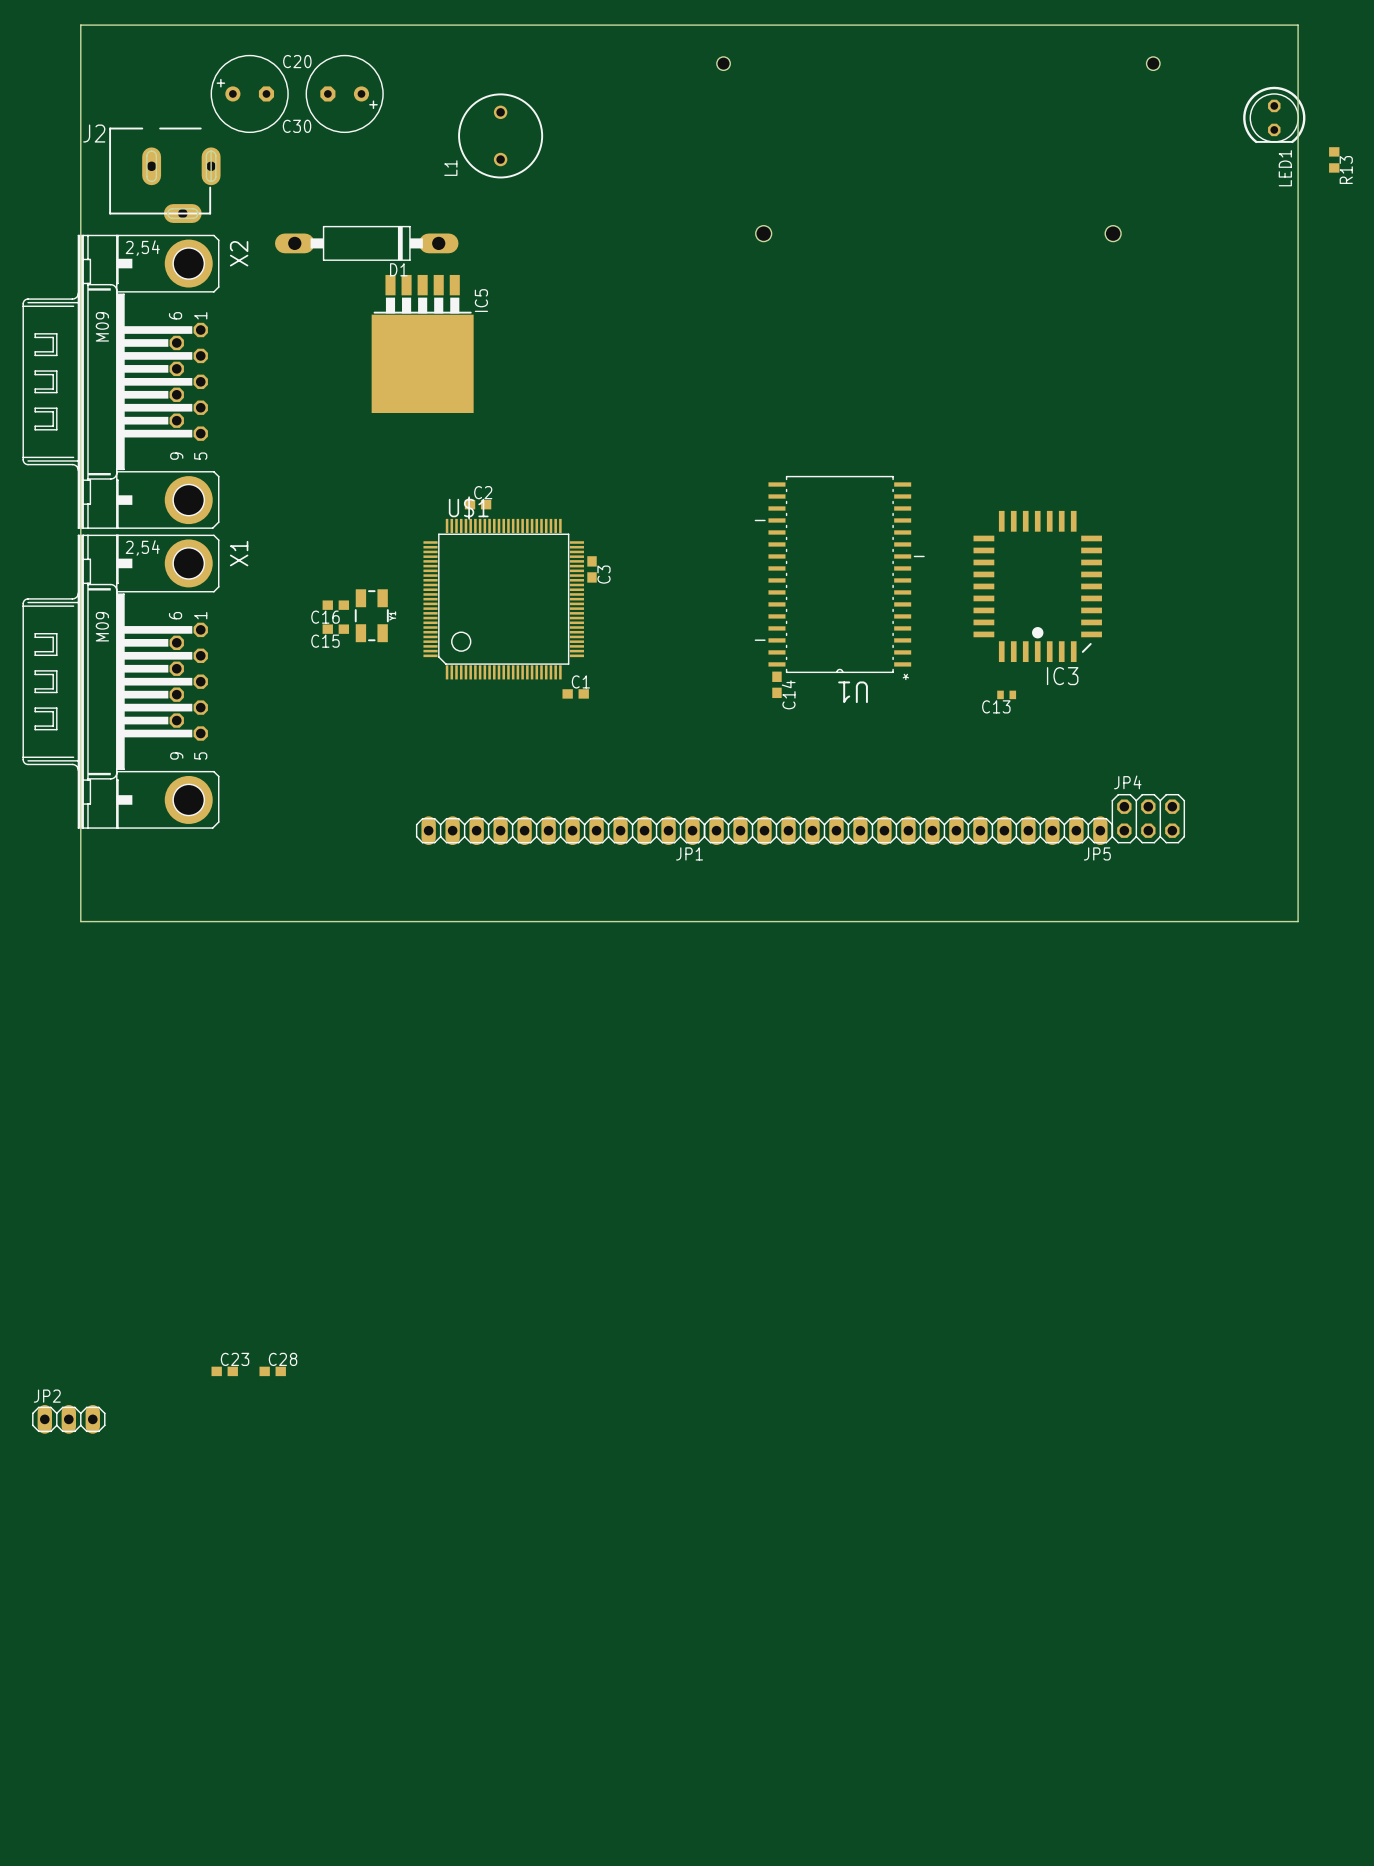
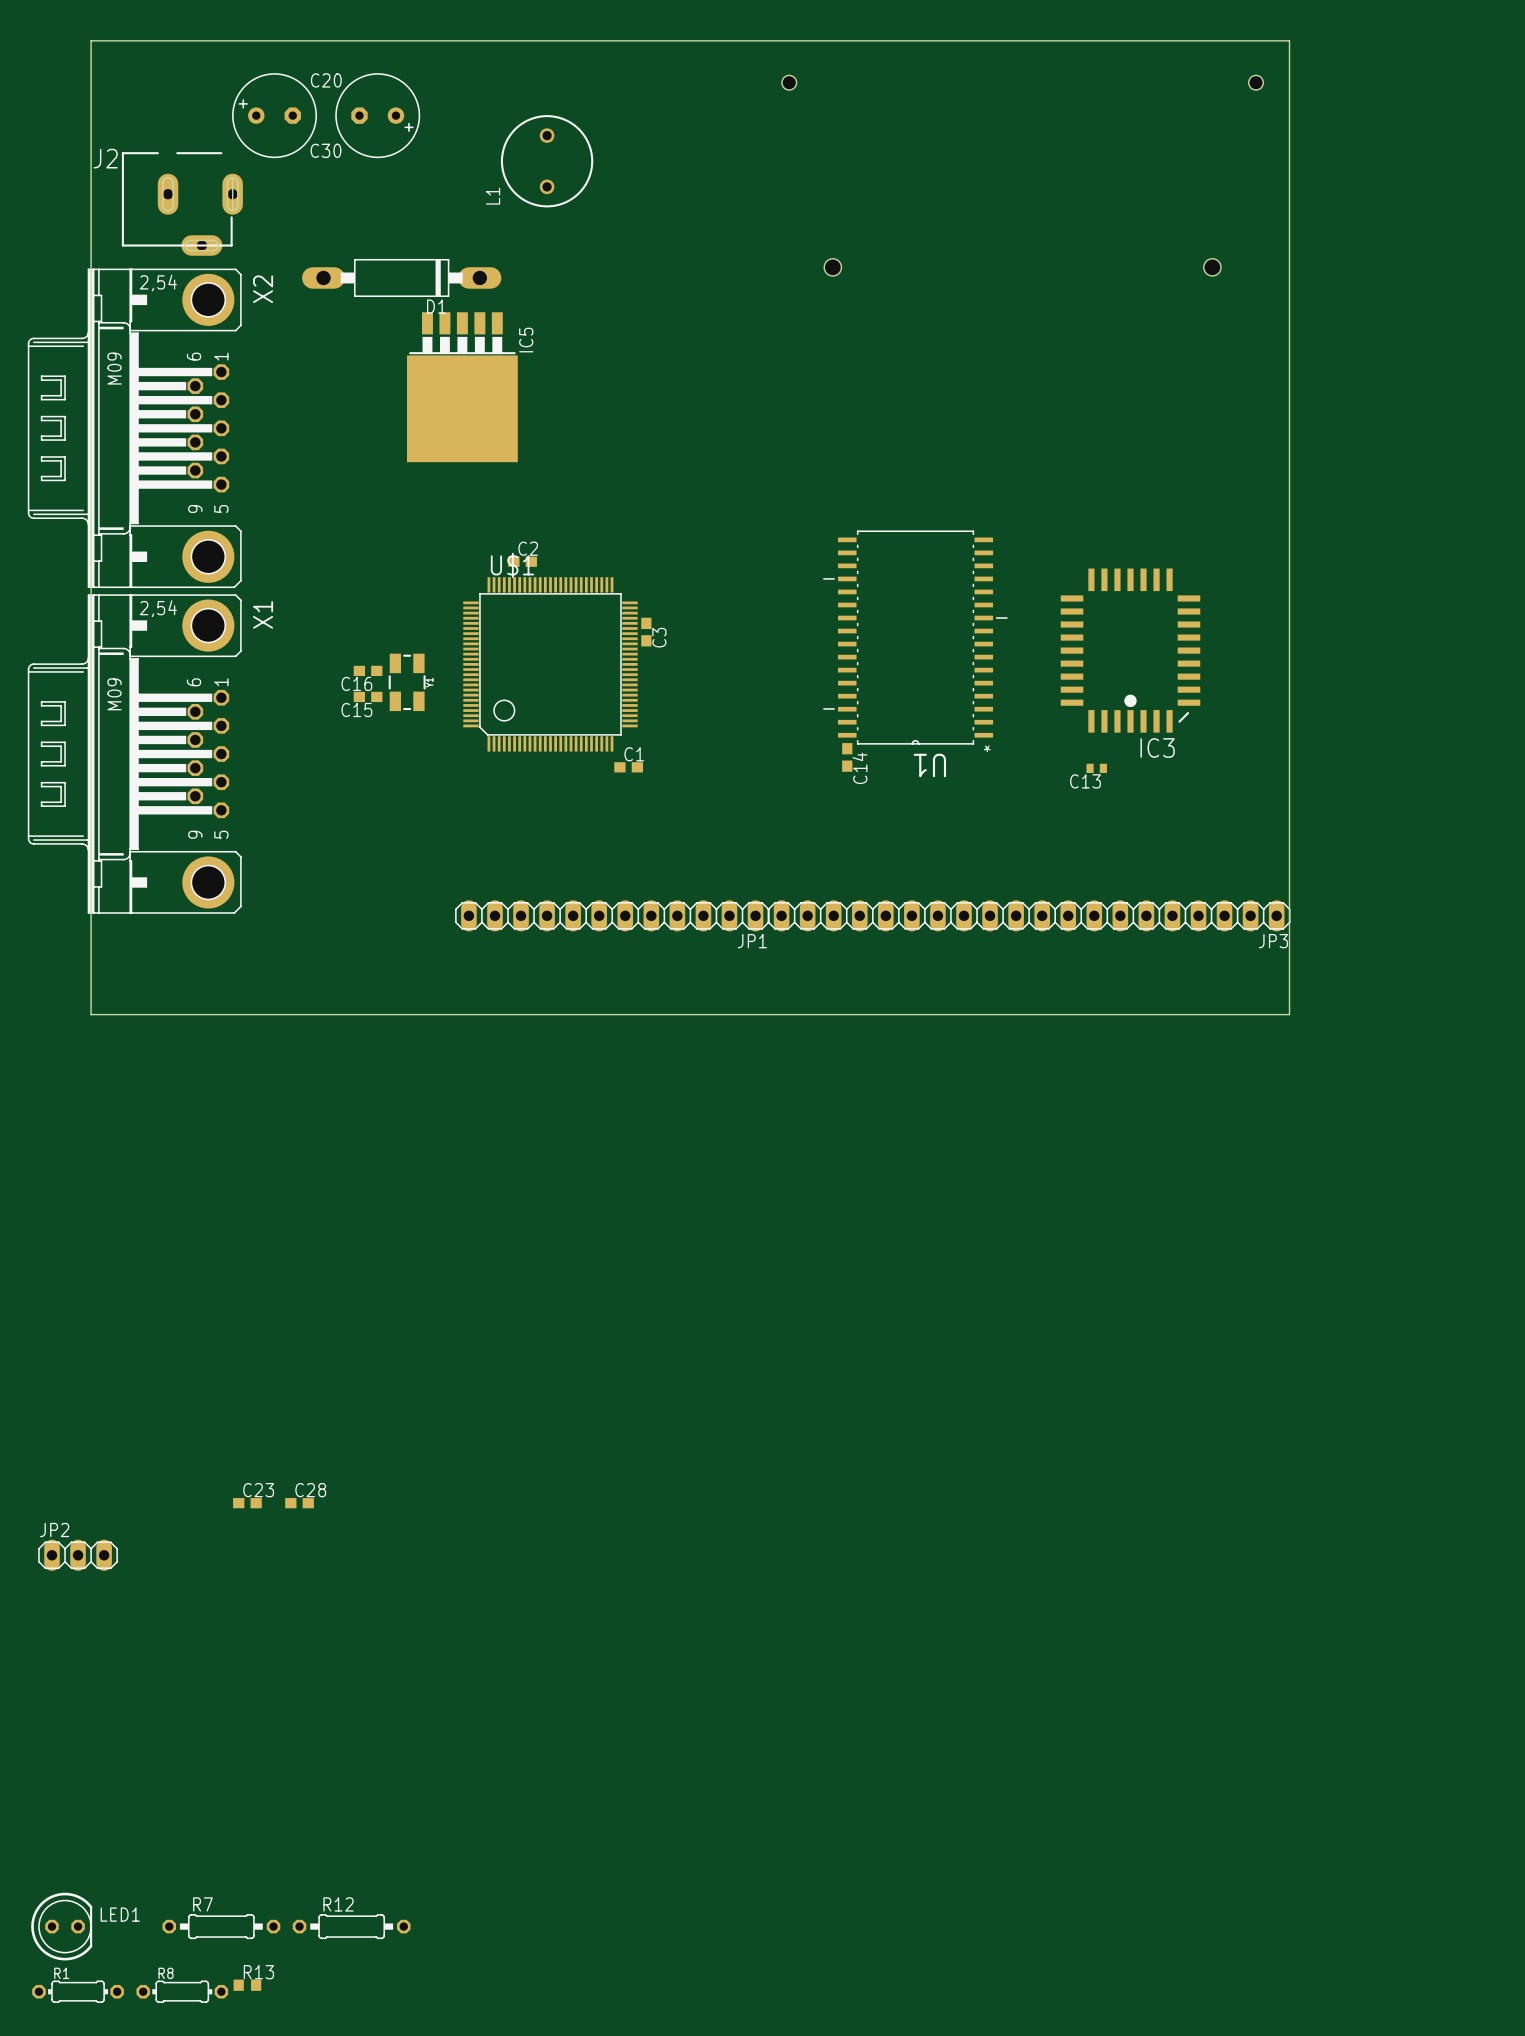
board edge: (1184, 25) (1298, 25) (1298, 921) (1184, 921) -> (1289, 40) (1289, 1014)
LED1 rotation: 0° (1274, 114) -> 90° counterclockwise (61, 1926)
LED1 position: (1274, 114) -> (61, 1926)
R13 rotation: 0° (1334, 159) -> 90° clockwise (247, 1985)
R13 position: (1334, 159) -> (247, 1985)
R13 name position: R13 (1346, 169) -> R13 (258, 1972)
JP4: (1148, 818) -> none
JP5: (908, 830) -> none
JP3: none -> (1029, 915)
R7: none -> (221, 1926)
R12: none -> (351, 1926)
R1: none -> (78, 1991)
R8: none -> (182, 1991)

